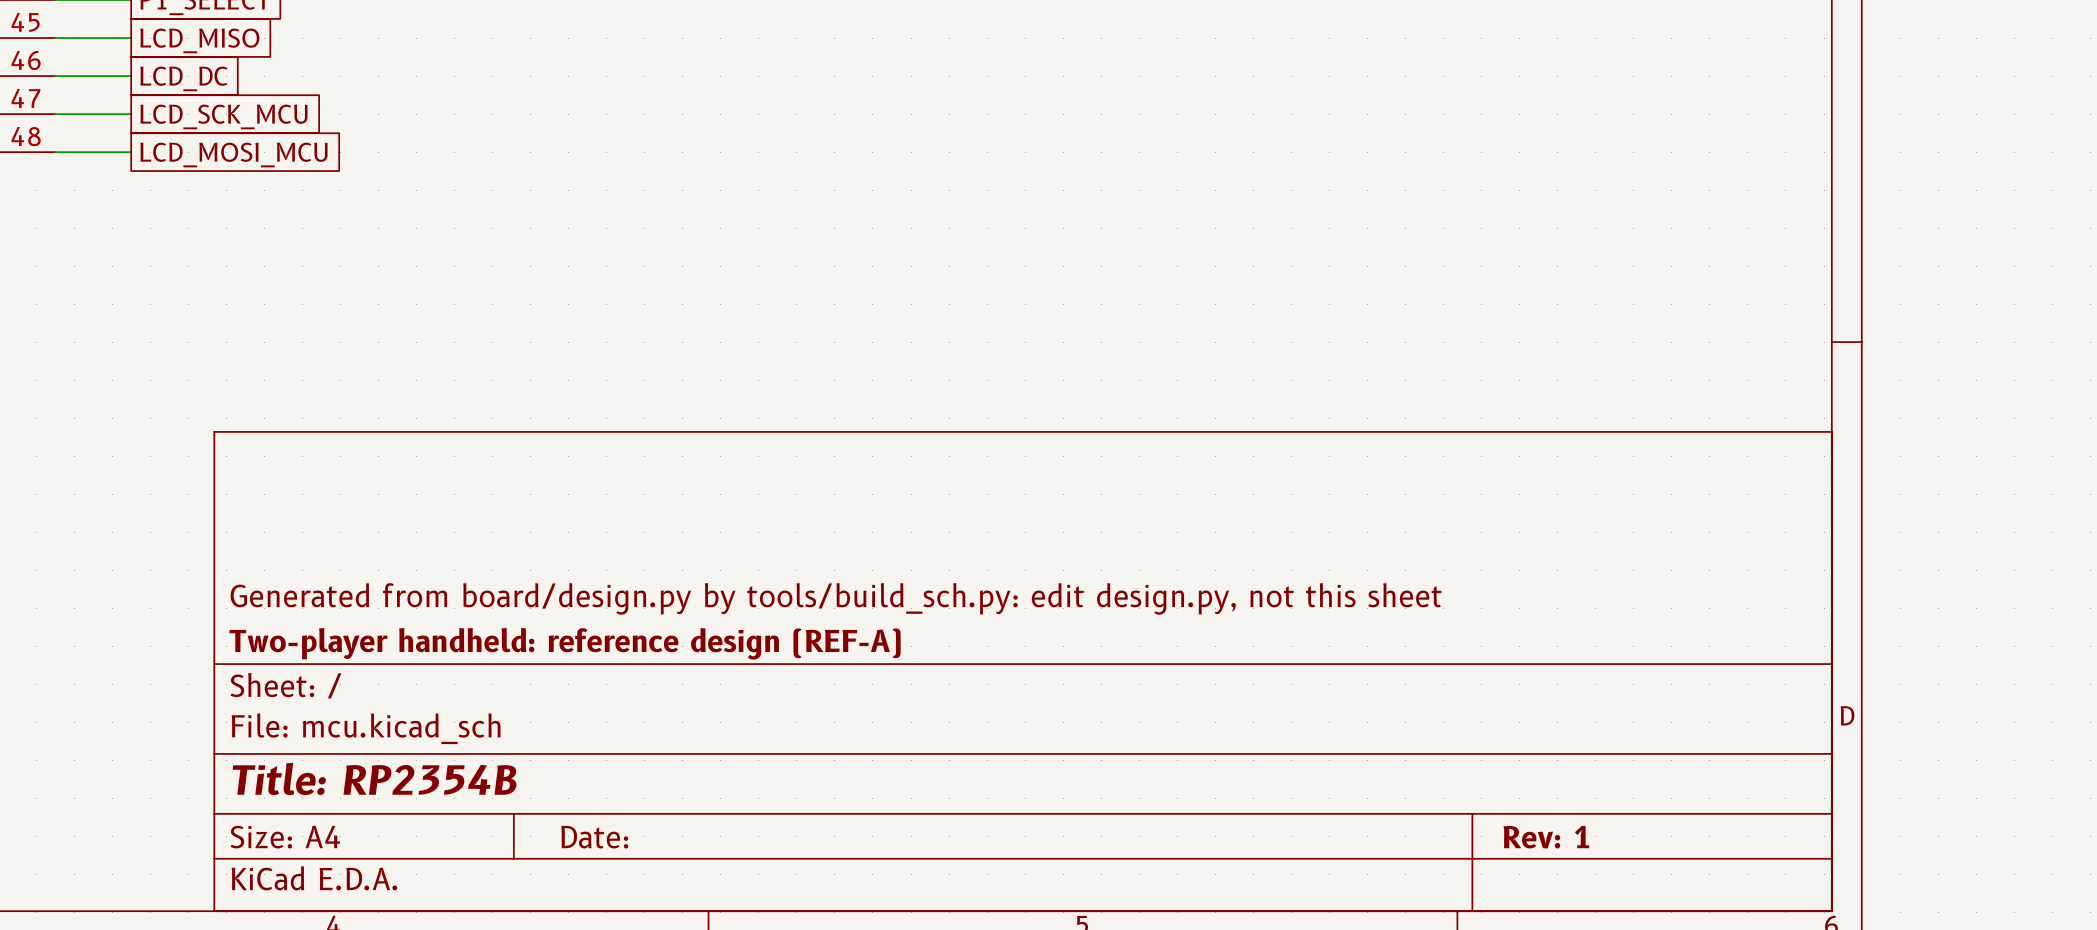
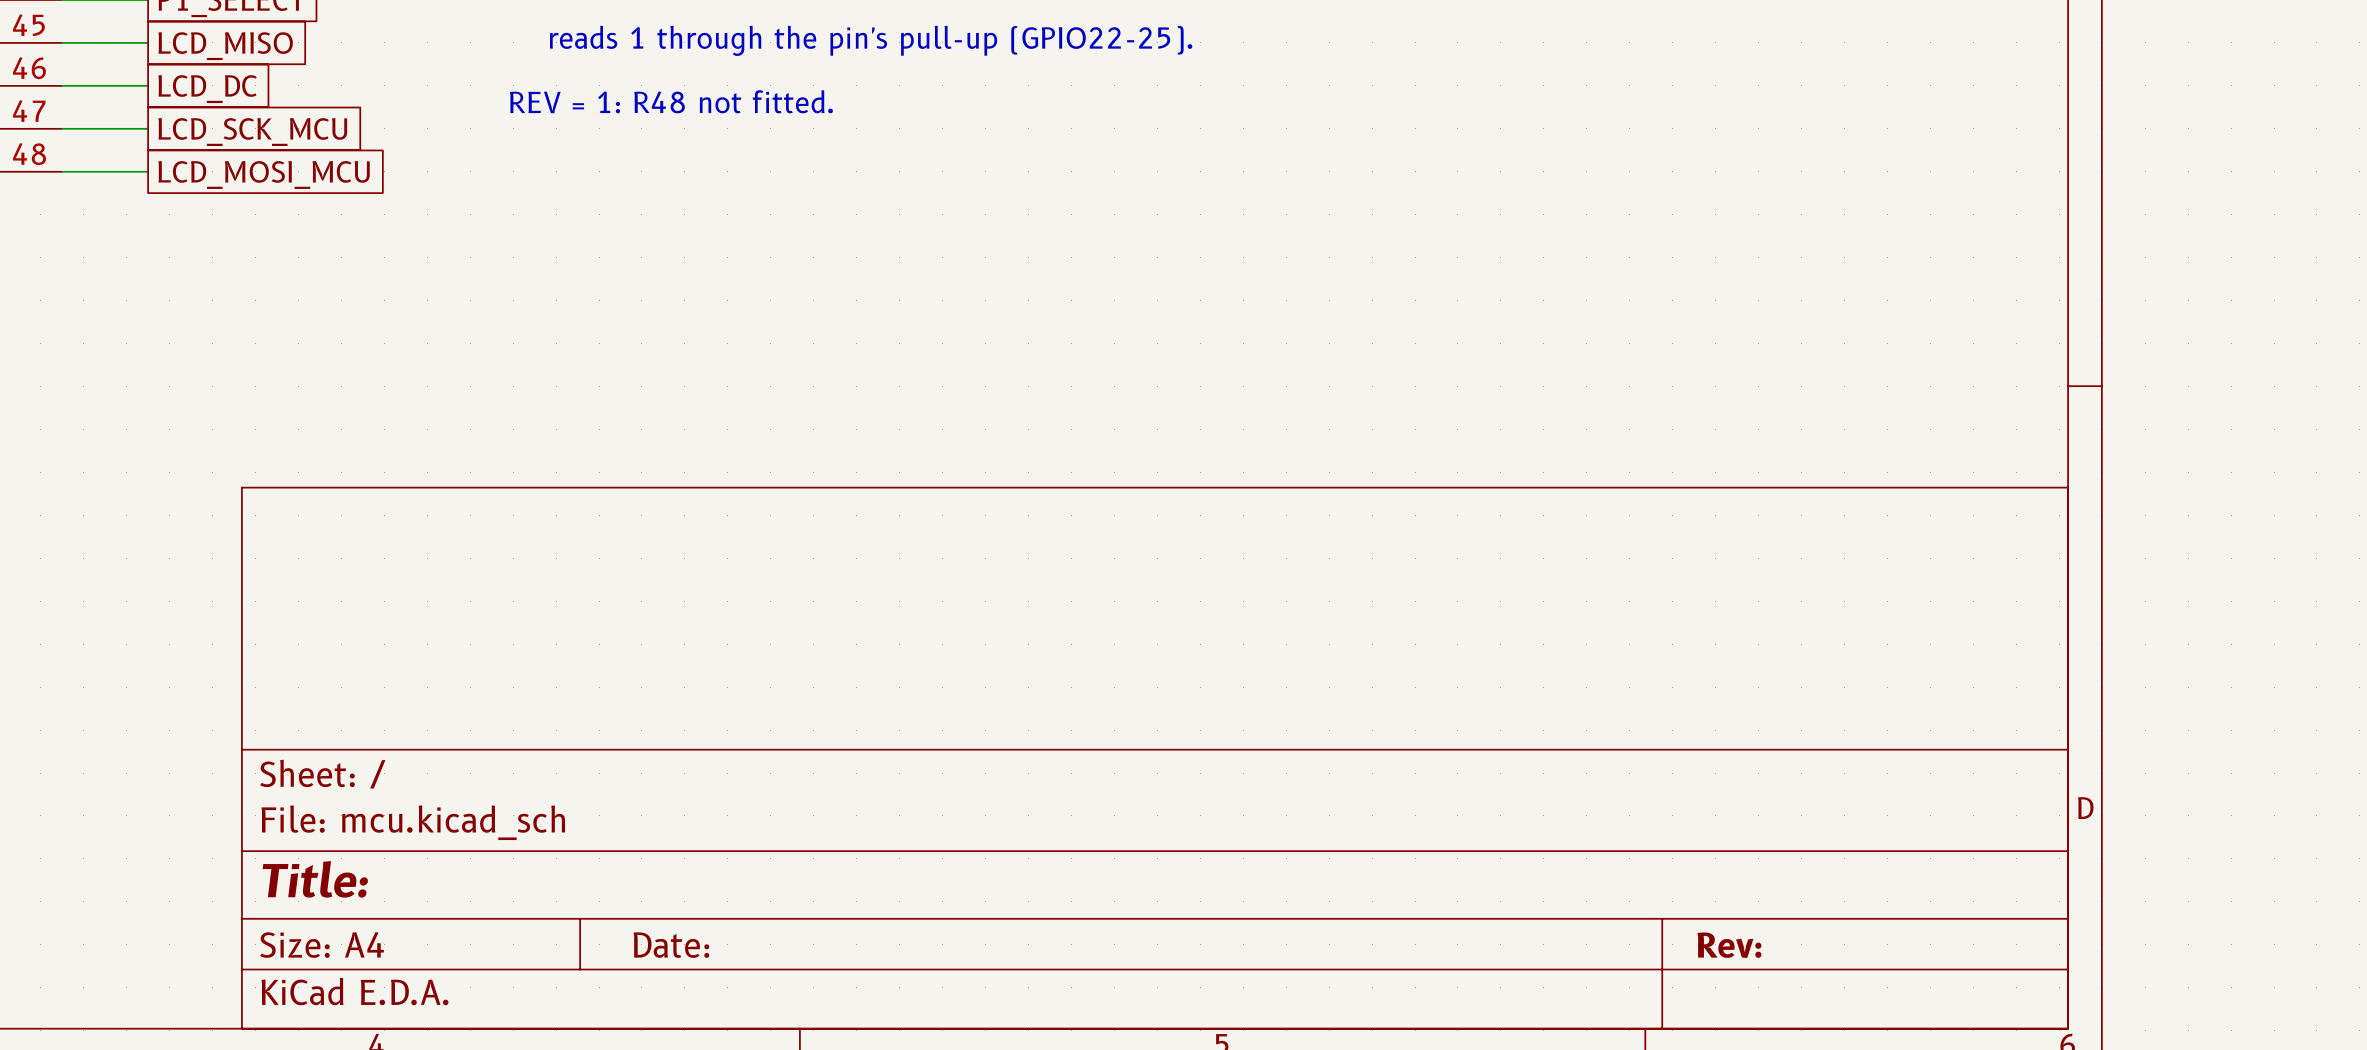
text: none -> reads 1 through the pin's pull-up (GPIO22-25). (871, 40)
text: none -> REV = 1: R48 not fitted. (671, 101)
title block: Generated from board/design.py by tools/build_sch.py: edit design.py, not this sheet (836, 598) -> none
title block: Two-player handheld: reference design (REF-A) (565, 643) -> none
title block: Title: RP2354B (374, 778) -> Title: (315, 879)
title block: Rev: 1 (1546, 837) -> Rev: (1729, 945)

